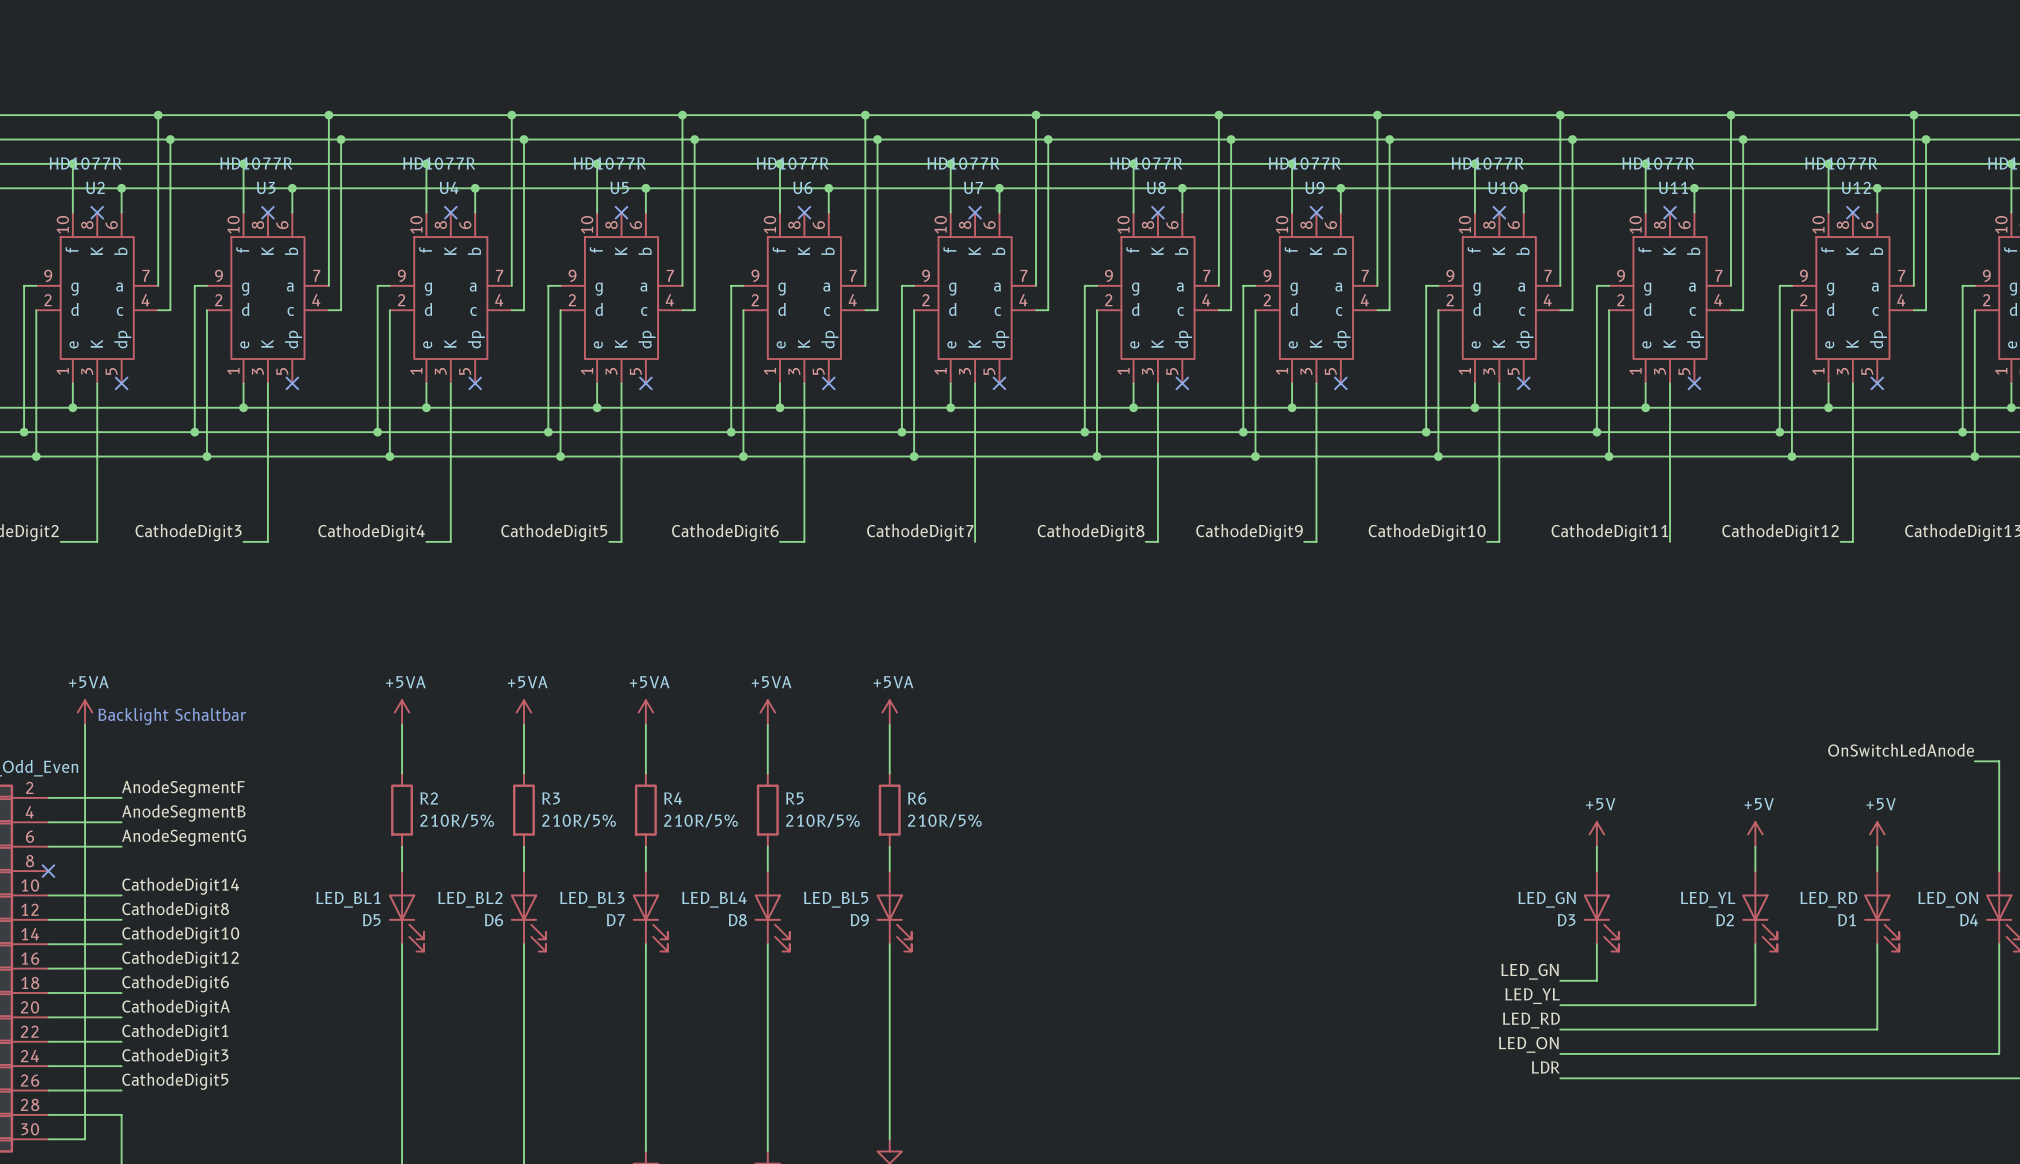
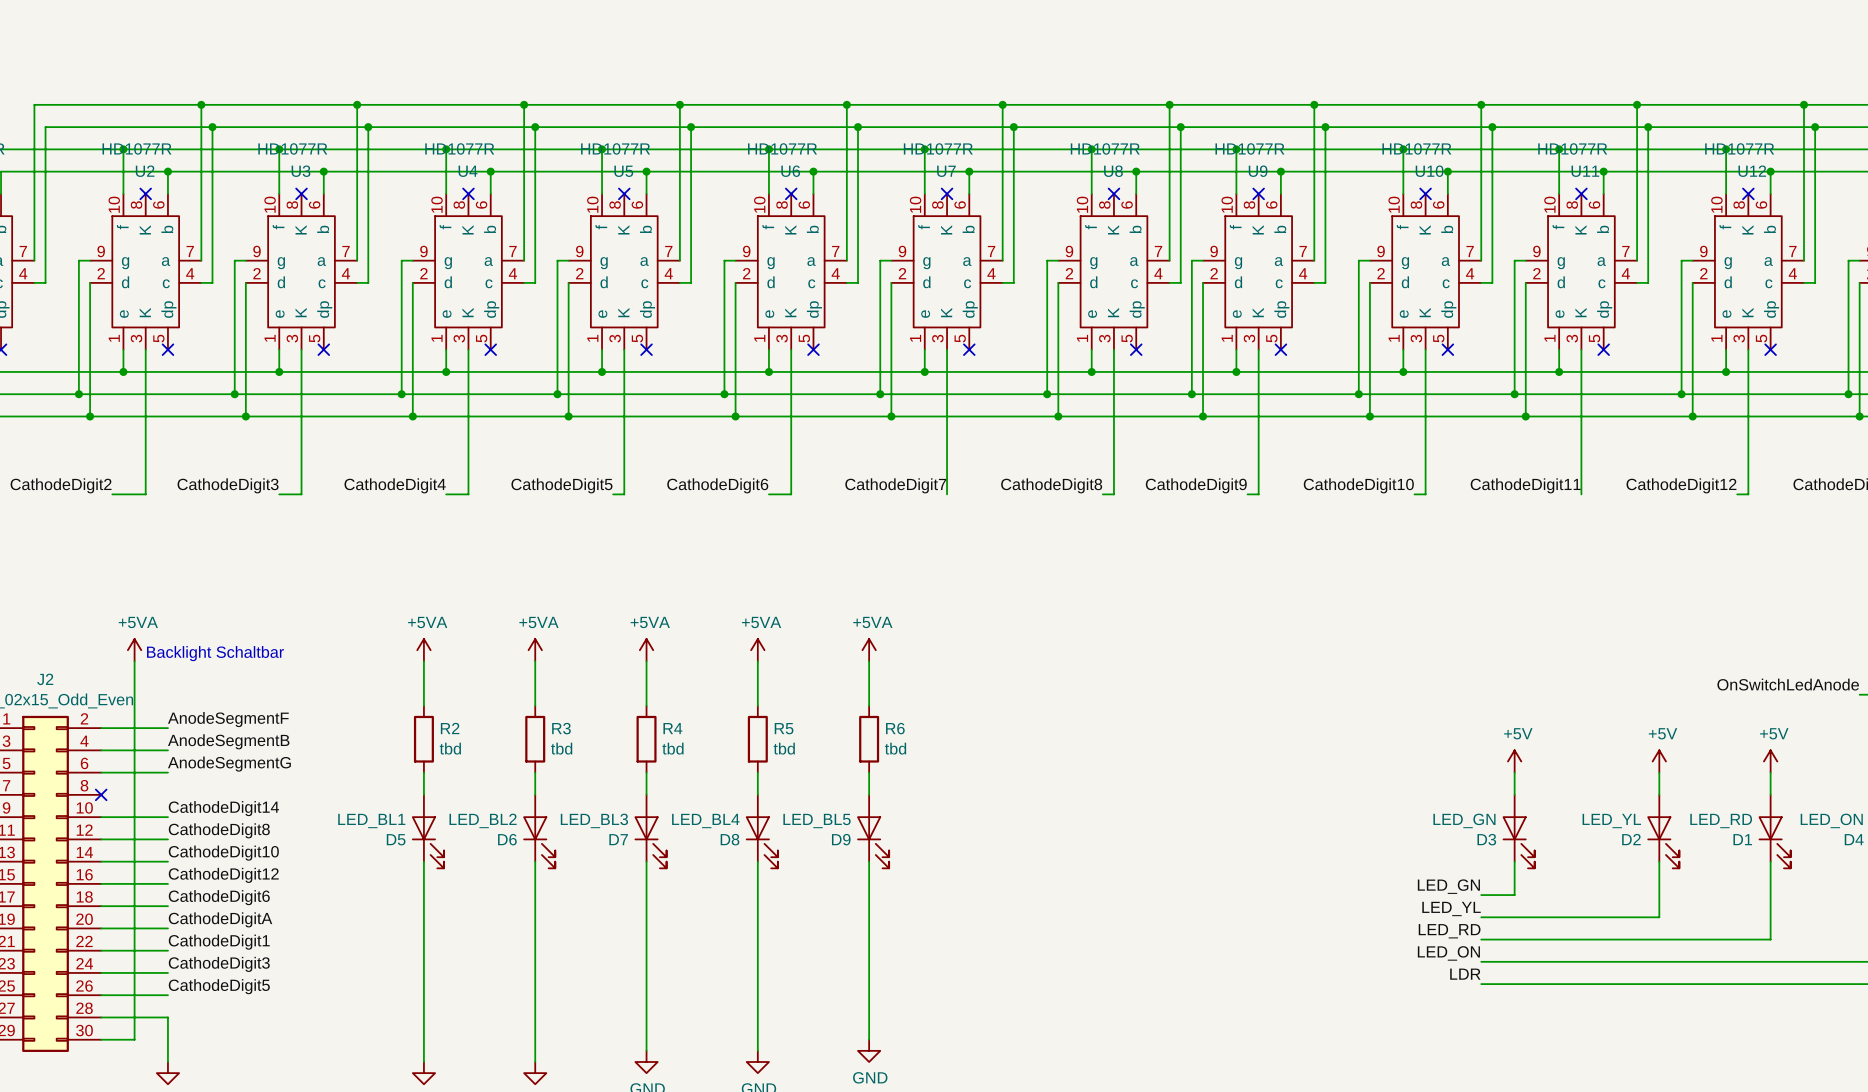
R2 value: 210R/5% (457, 820) -> tbd (450, 748)
R3 value: 210R/5% (579, 820) -> tbd (561, 748)
R4 value: 210R/5% (700, 820) -> tbd (672, 748)
R5 value: 210R/5% (822, 820) -> tbd (784, 748)
R6 value: 210R/5% (944, 820) -> tbd (895, 748)

